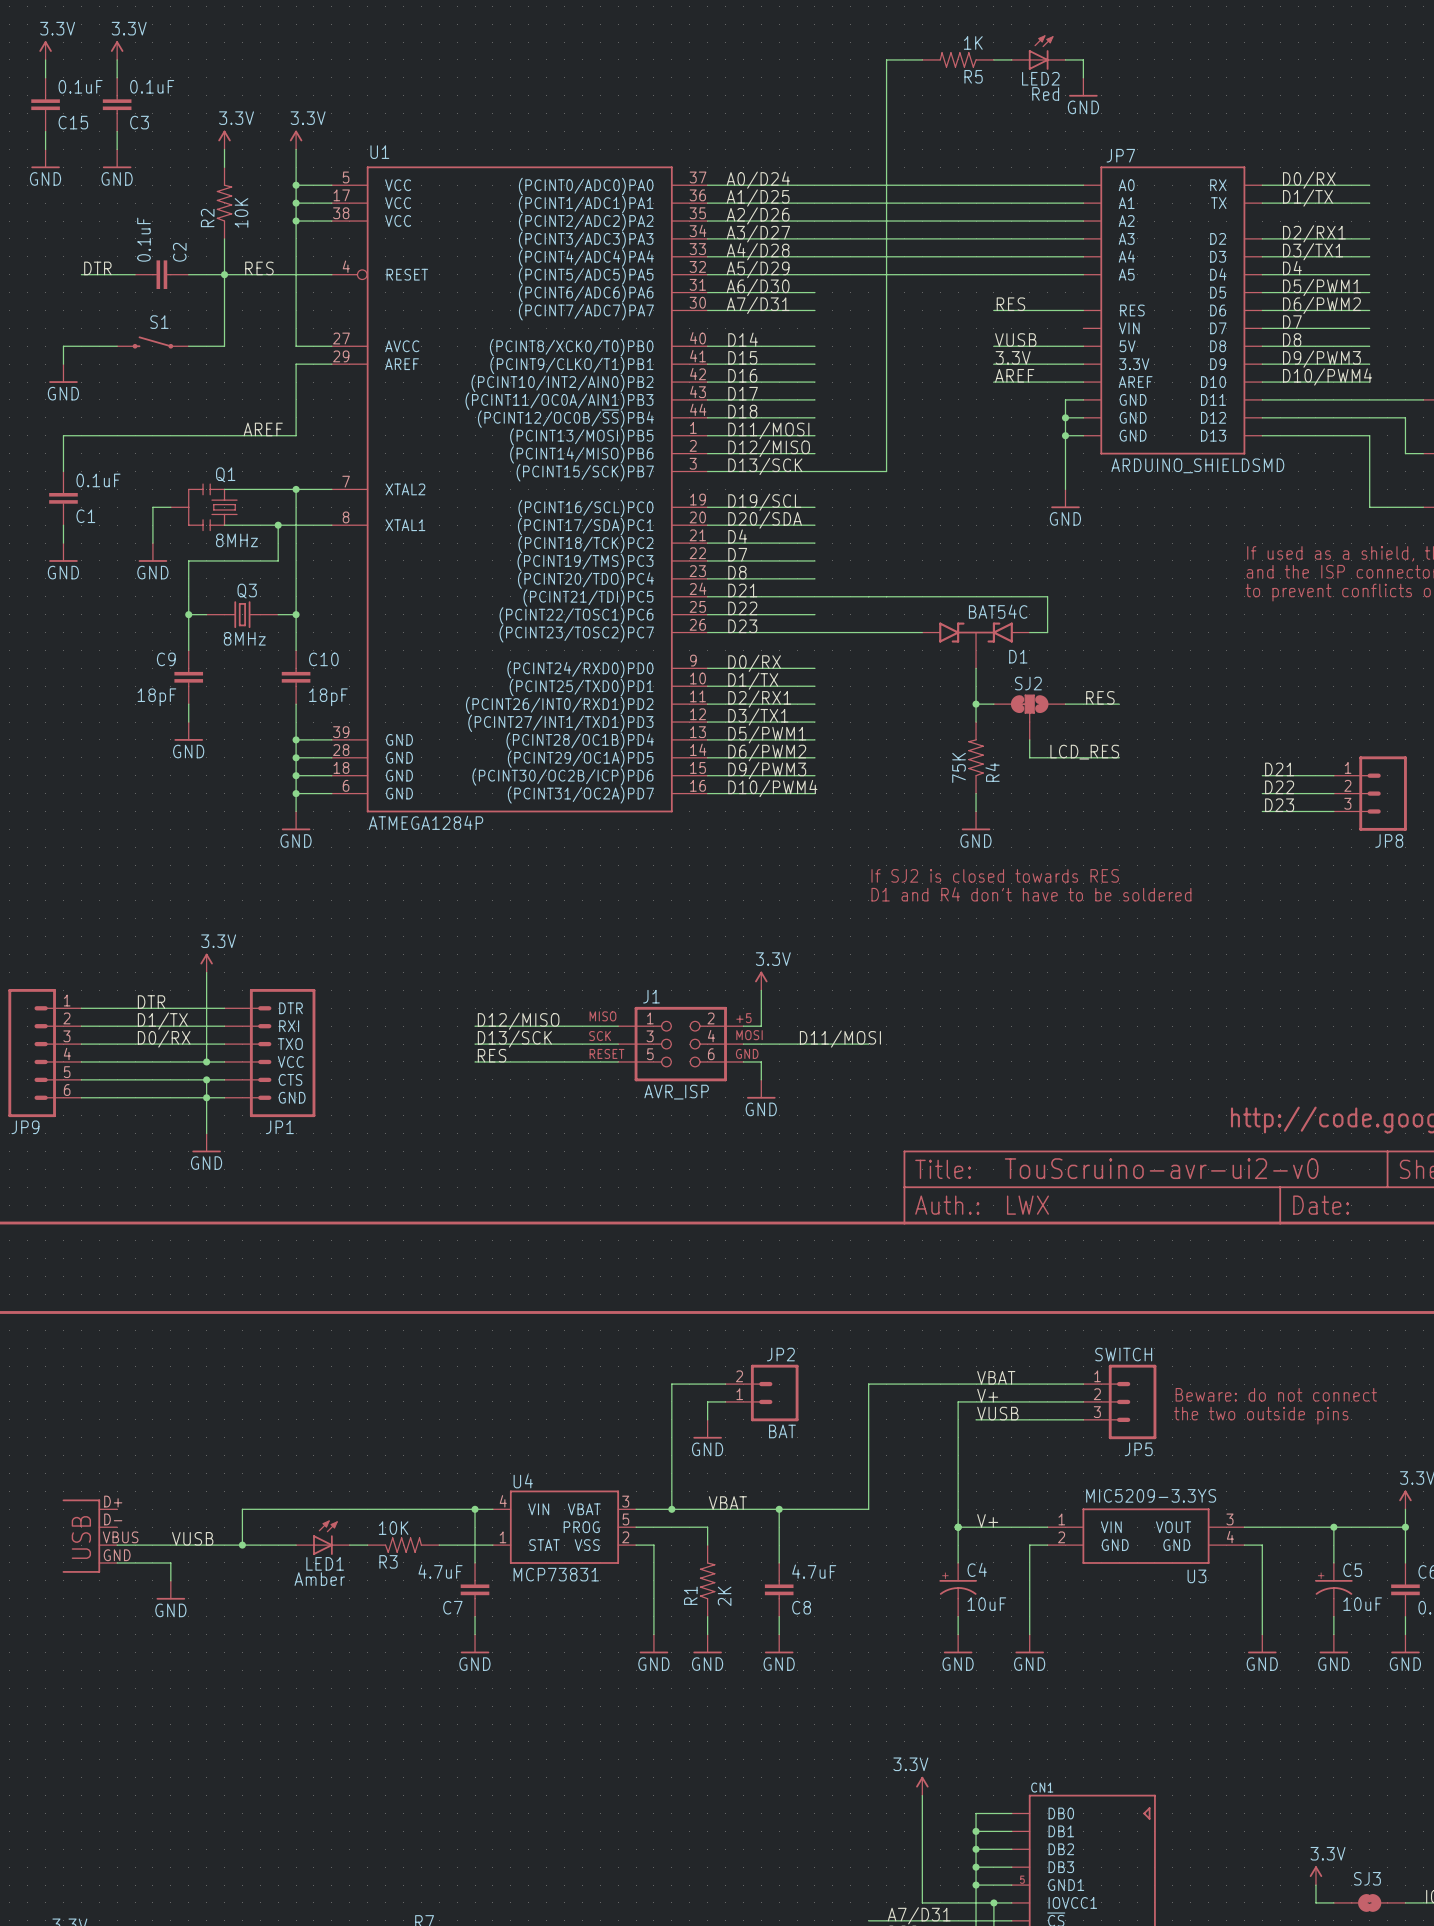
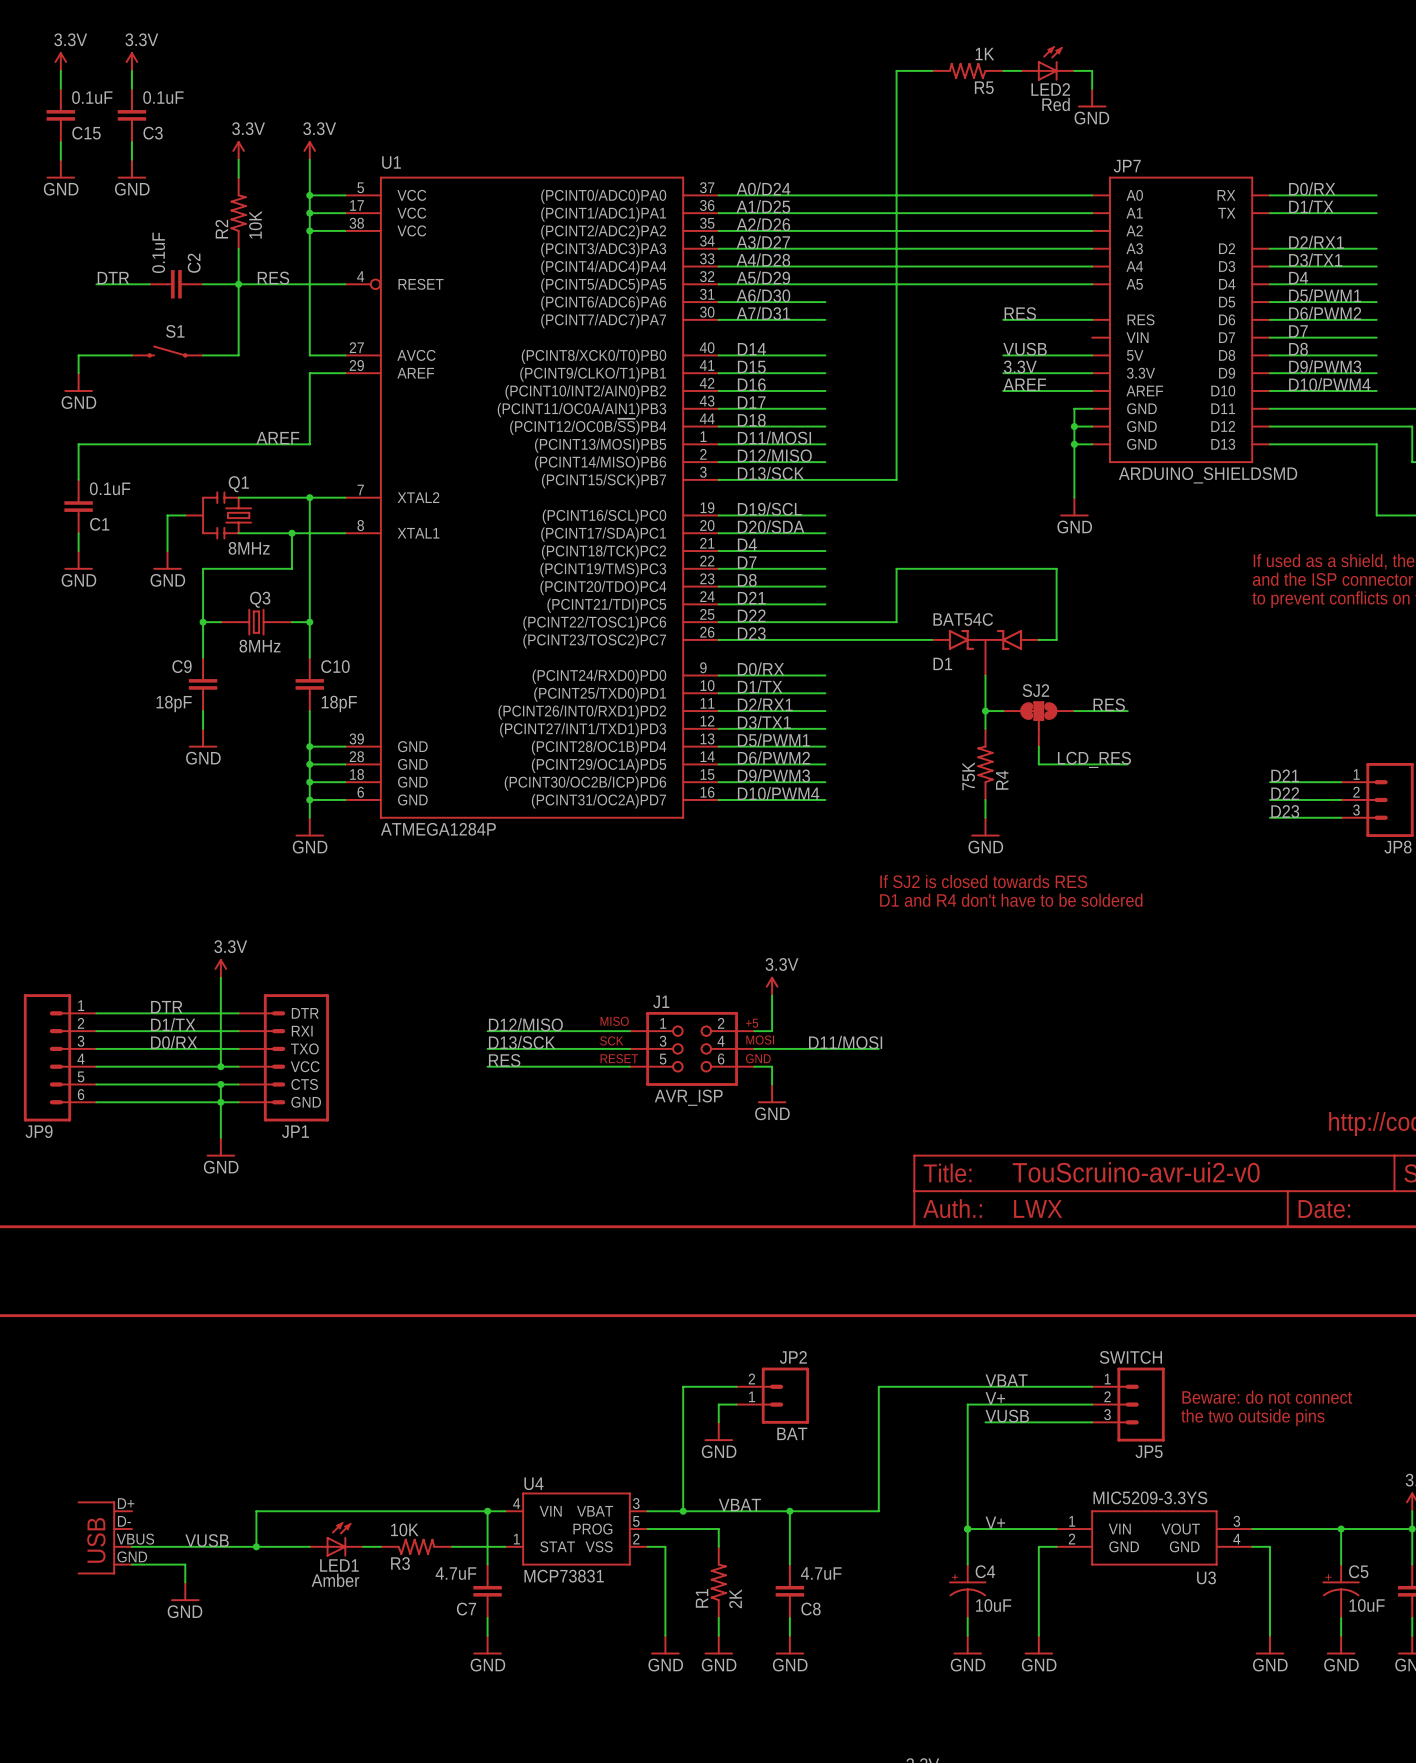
wire: (814, 596) (1047, 596) -> (825, 622) (896, 622) (896, 568) (1056, 568) (1056, 604)
D1 flip: as is (976, 632) -> left-right (985, 639)

